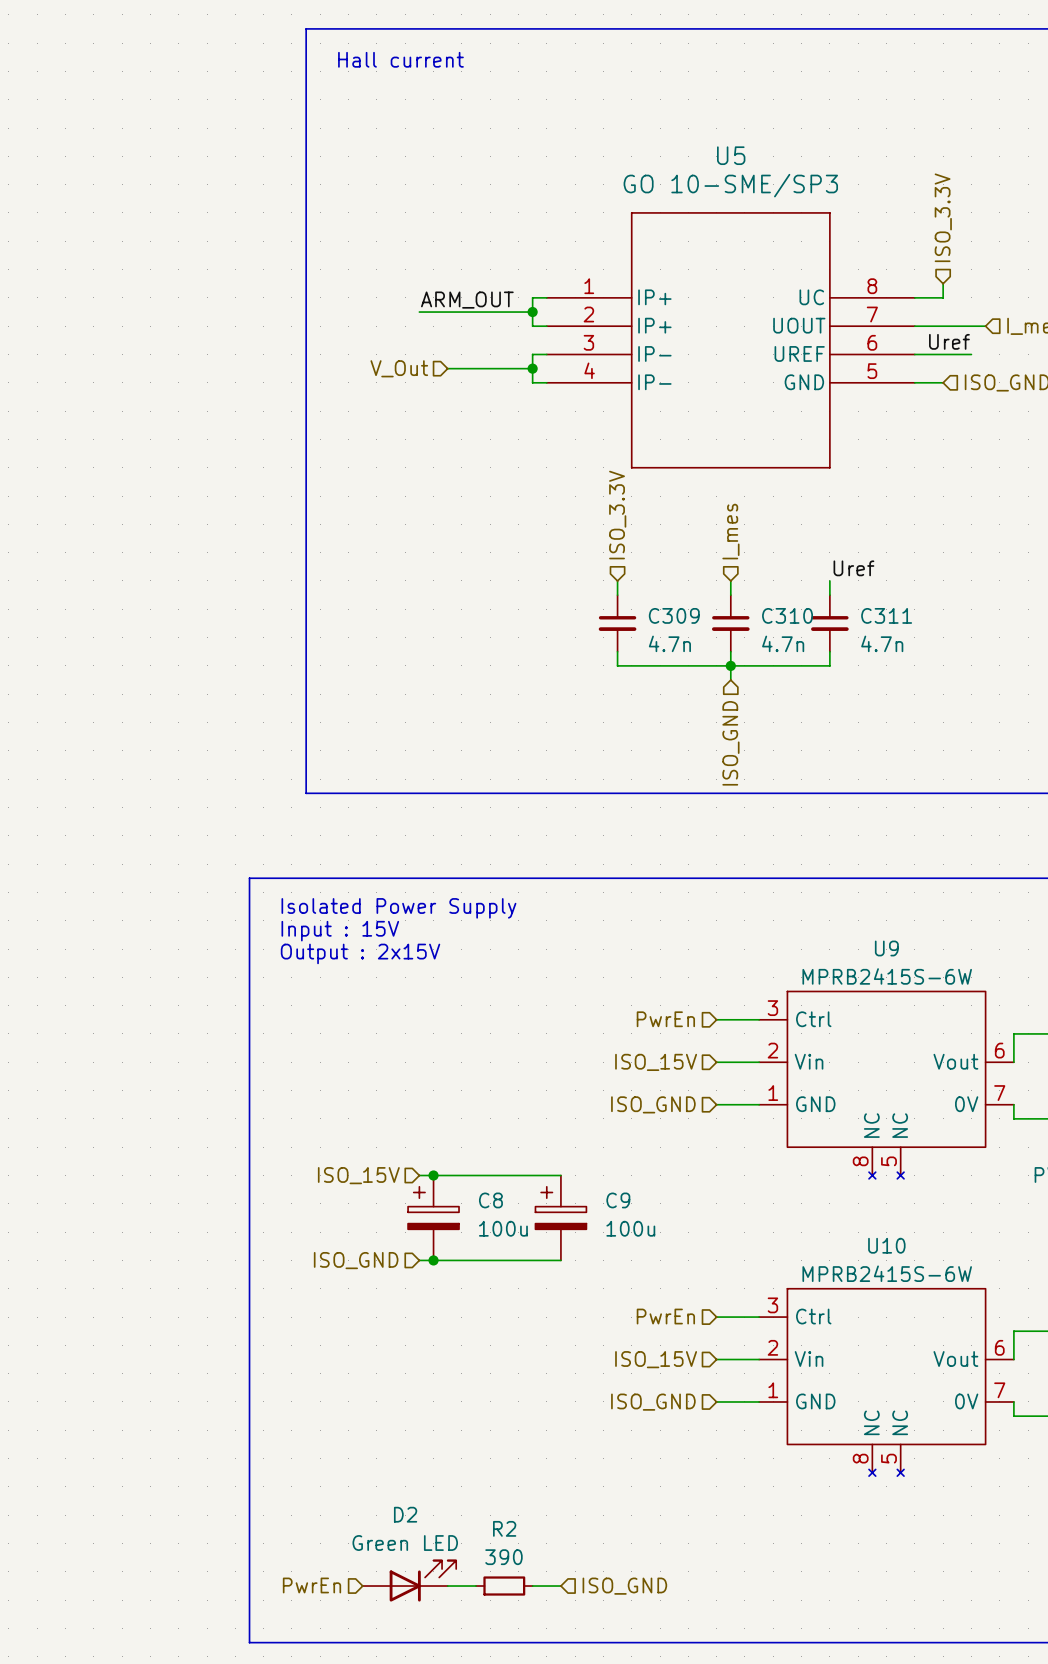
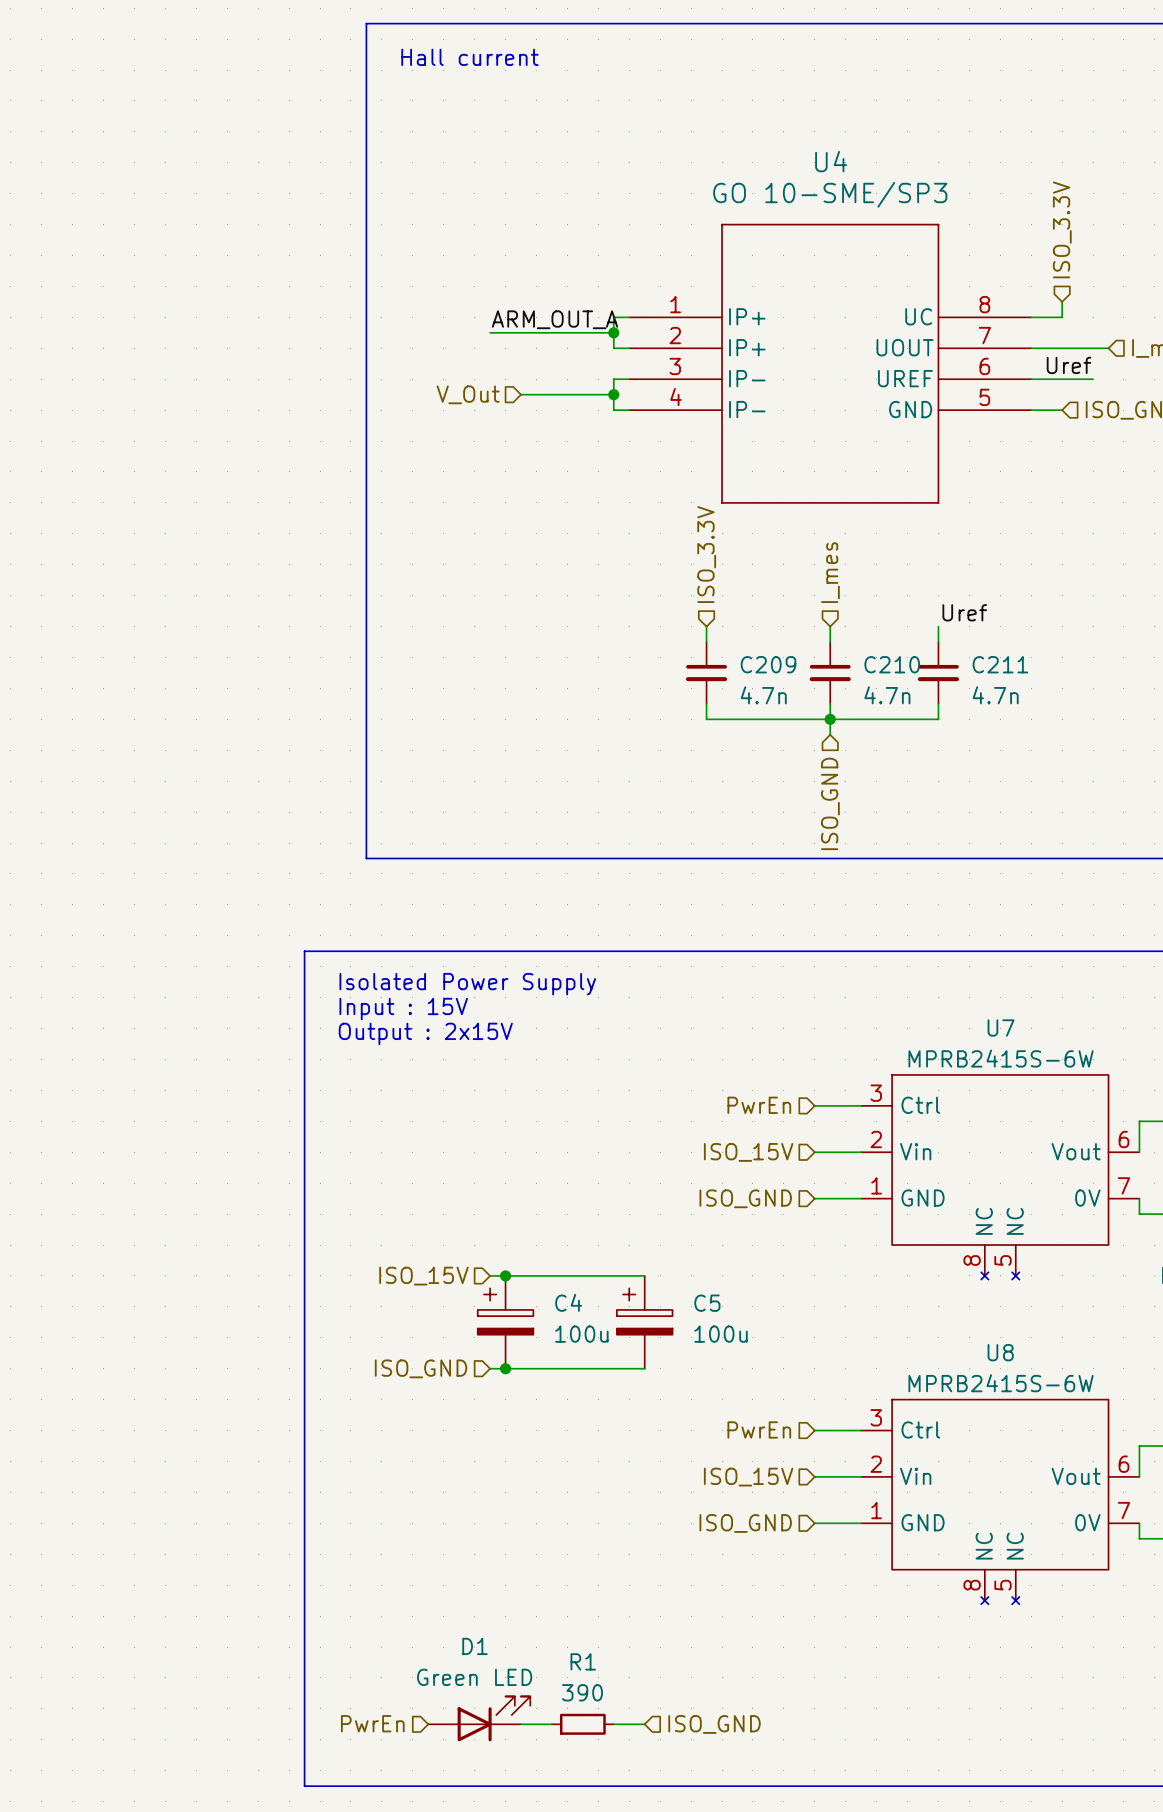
U5 name: U5 (731, 155) -> U4 (831, 161)
label: ARM_OUT (467, 300) -> ARM_OUT_A (554, 319)
C309 name: C309 (674, 615) -> C209 (768, 664)
C310 name: C310 (787, 615) -> C210 (892, 664)
C311 name: C311 (886, 615) -> C211 (1000, 664)
U9 name: U9 (886, 948) -> U7 (1001, 1027)
C8 name: C8 (490, 1200) -> C4 (568, 1302)
C9 name: C9 (618, 1200) -> C5 (707, 1303)
U10 name: U10 (886, 1245) -> U8 (1000, 1352)
D2 name: D2 (405, 1514) -> D1 (475, 1646)
R2 name: R2 (504, 1528) -> R1 (583, 1661)

